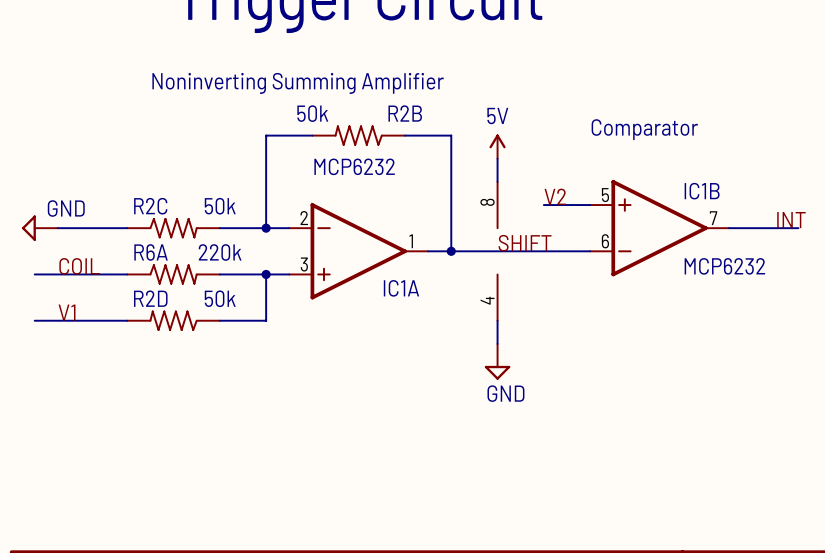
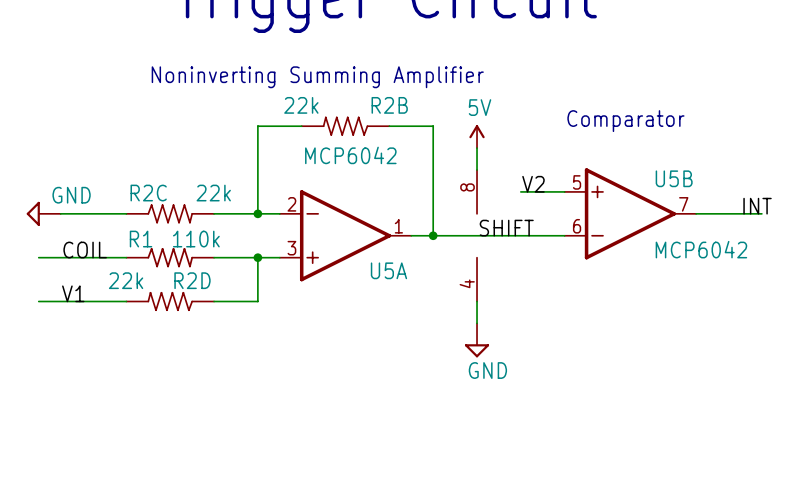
R2B value: 50k (312, 113) -> 22k (301, 105)
IC1A value: MCP6232 (354, 166) -> MCP6042 (350, 155)
IC1B name: IC1B (702, 191) -> U5B (674, 178)
R2C value: 50k (220, 206) -> 22k (213, 193)
IC1B value: MCP6232 (724, 266) -> MCP6042 (701, 249)
R6A: 220k (173, 274) -> none
R1: none -> 110k (170, 257)
IC1A name: IC1A (401, 288) -> U5A (388, 270)
R2D name position: R2D (150, 298) -> R2D (192, 280)
R2D value: 50k (220, 298) -> 22k (126, 280)

